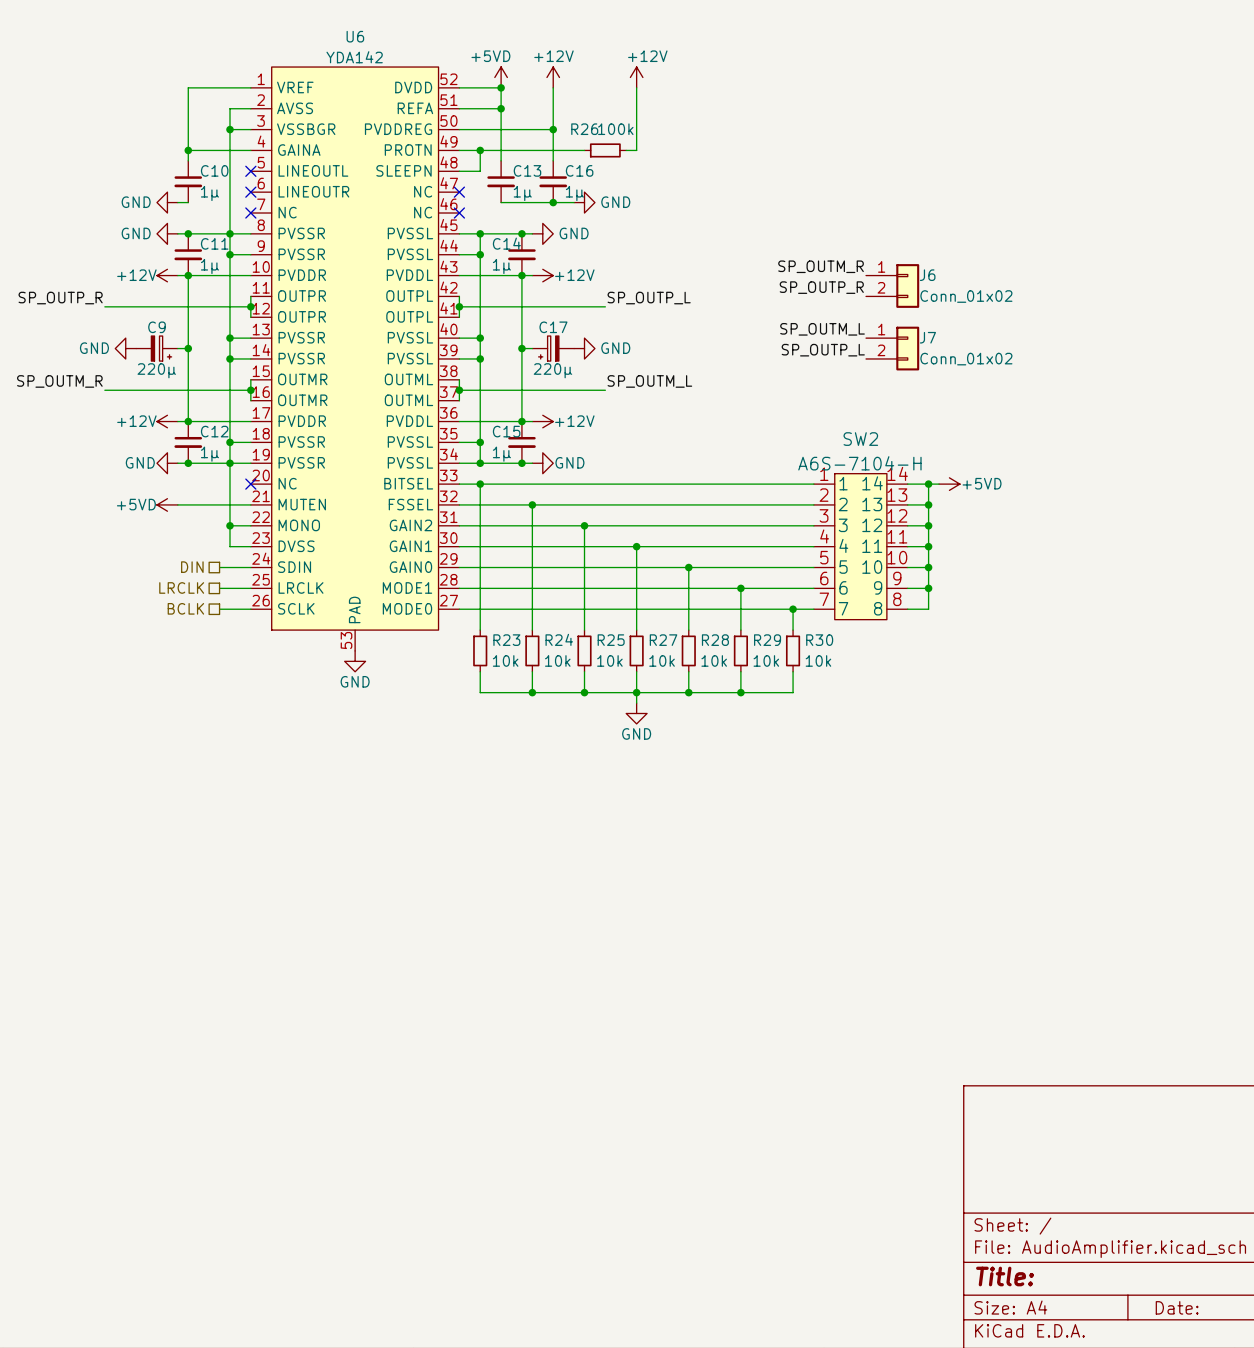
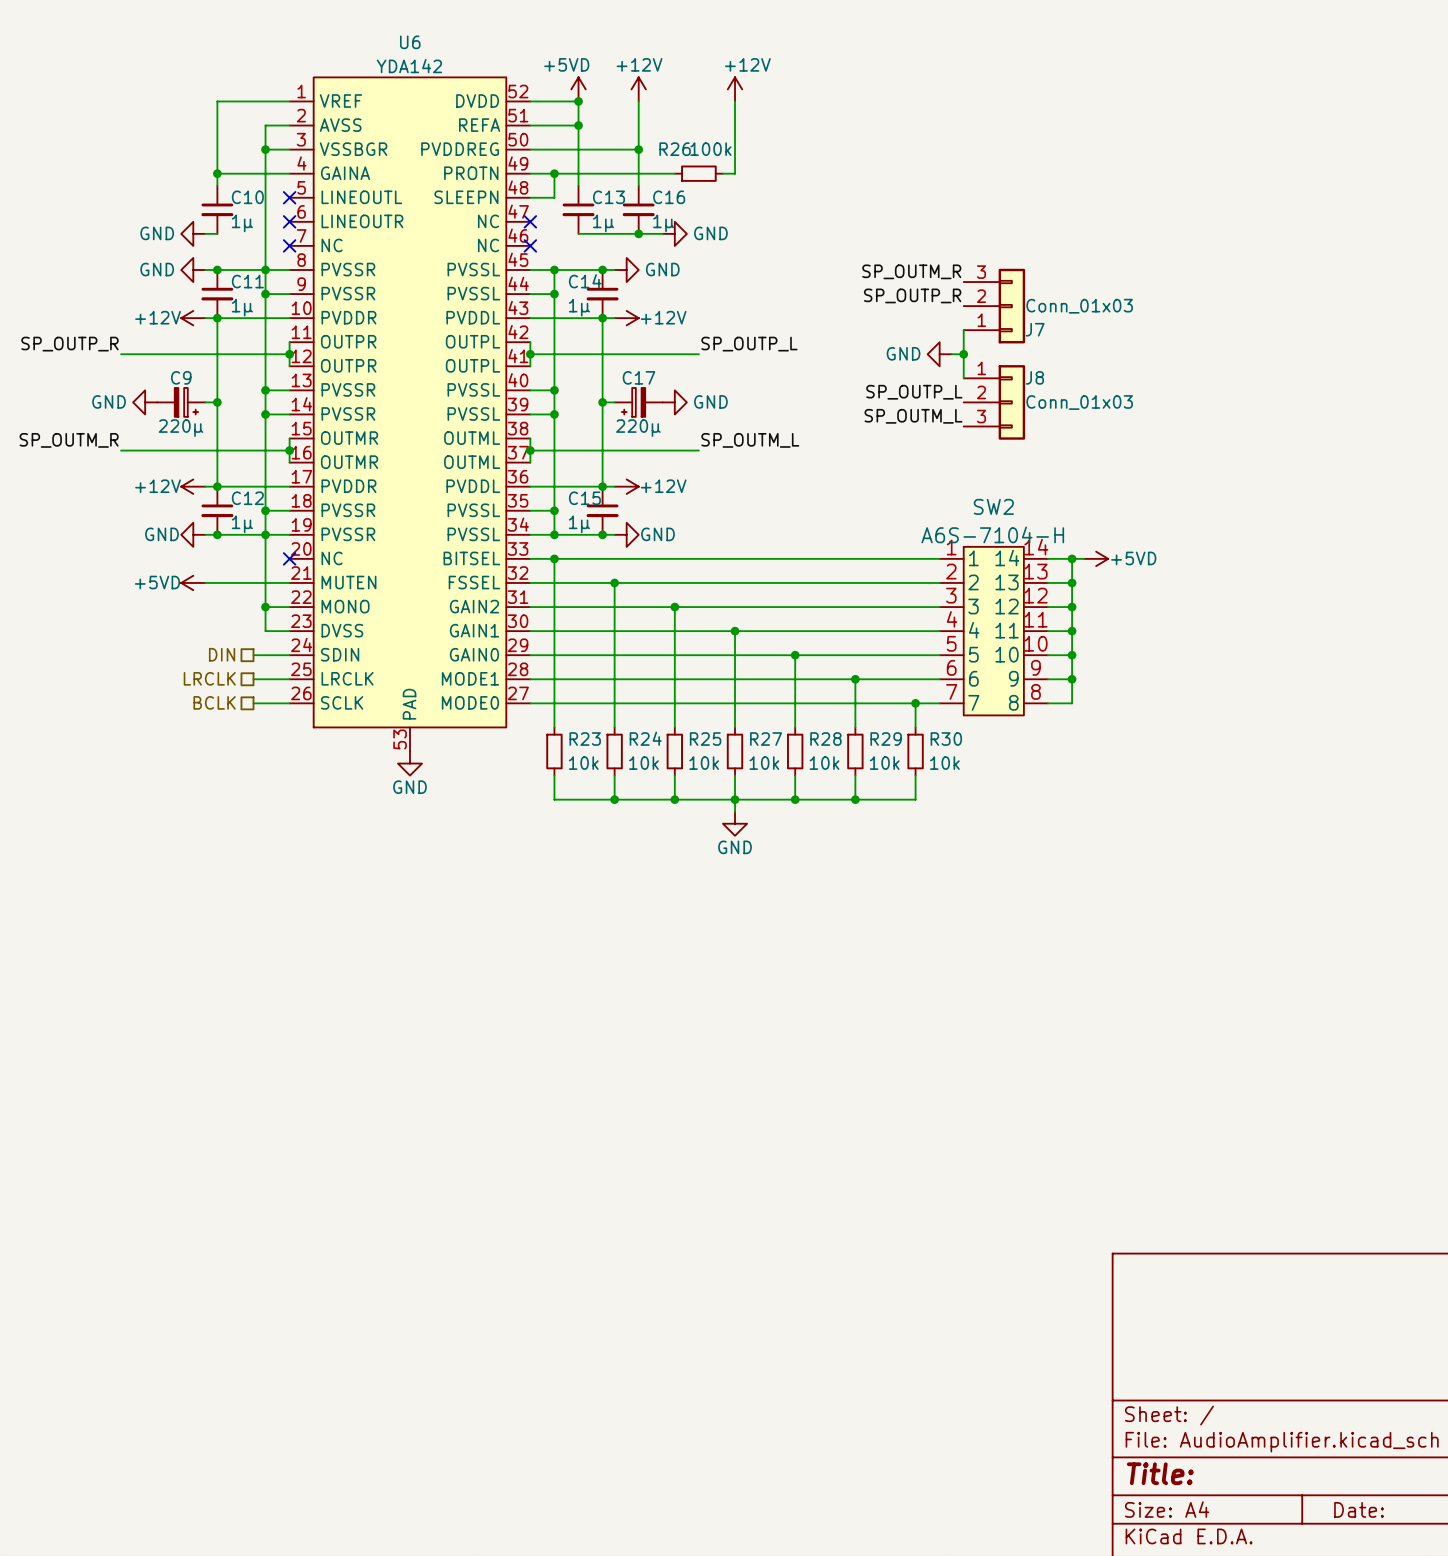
label position: SP_OUTM_R (821, 266) -> SP_OUTM_R (911, 271)
wire: none -> (963, 330) (963, 378)
J6: Conn_01x02 (892, 285) -> none
label position: SP_OUTP_R (821, 287) -> SP_OUTP_R (912, 295)
power symbol: none -> GND (939, 354)
wire: none -> (951, 354) (963, 354)
junction: none -> (963, 354)
J7 symbol: [866, 326, 920, 371] -> [963, 268, 1026, 344]
label position: SP_OUTM_L (822, 329) -> SP_OUTM_L (913, 416)
J7 name position: J7 (927, 337) -> J7 (1035, 329)
J8: none -> Conn_01x03 (994, 402)
label position: SP_OUTP_L (823, 350) -> SP_OUTP_L (914, 392)
J7 value: Conn_01x02 (966, 359) -> Conn_01x03 (1079, 306)

